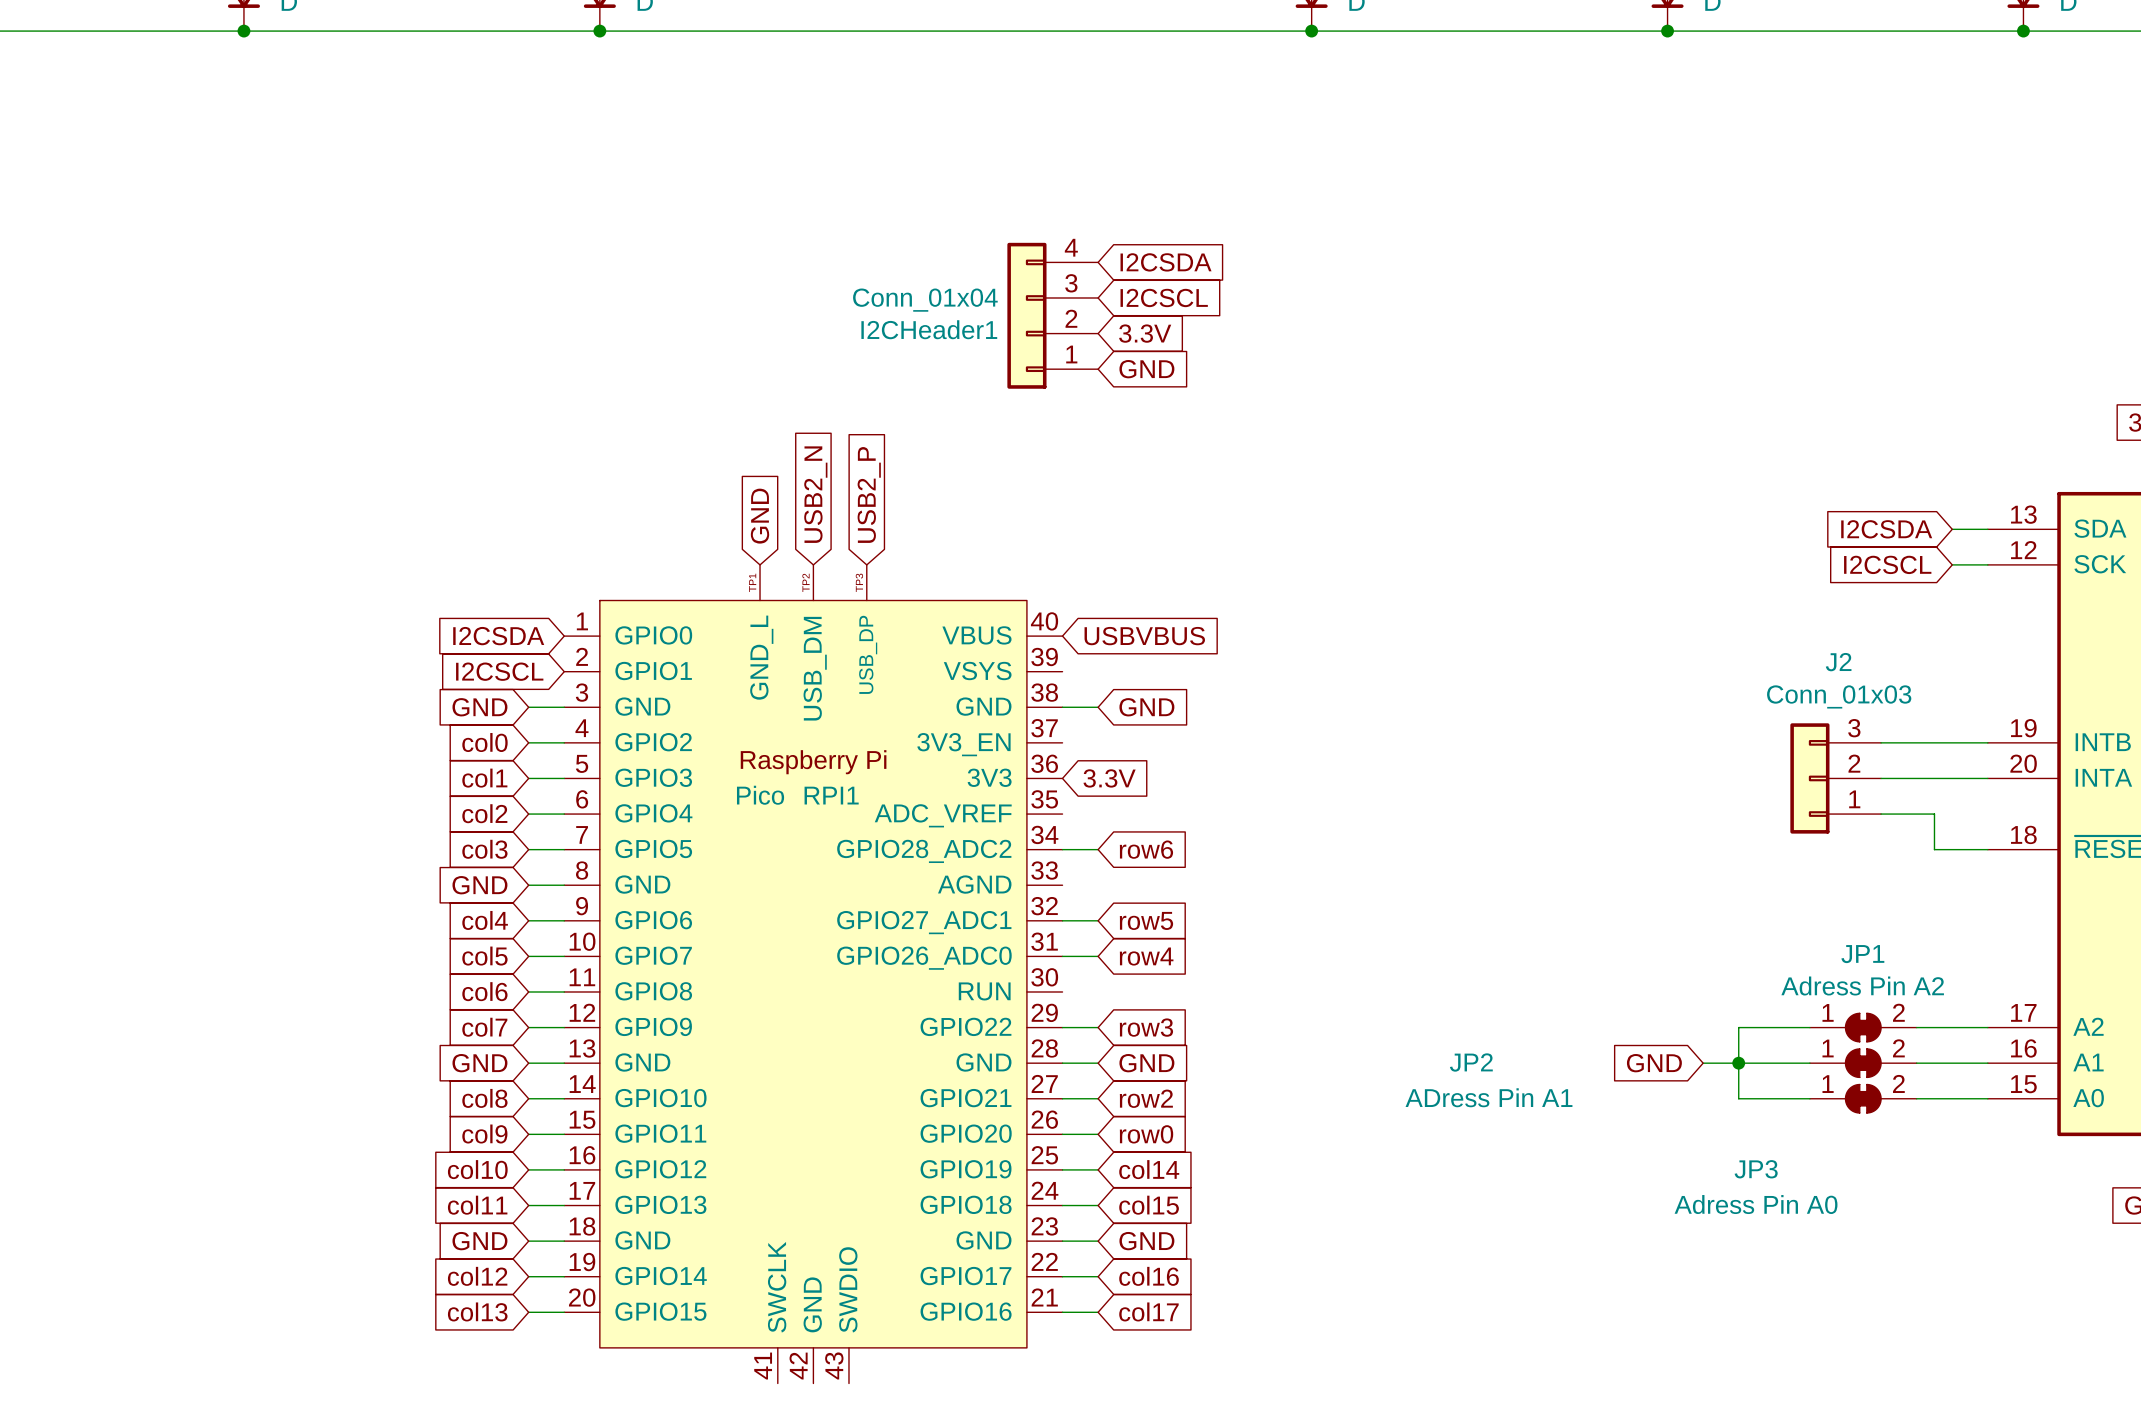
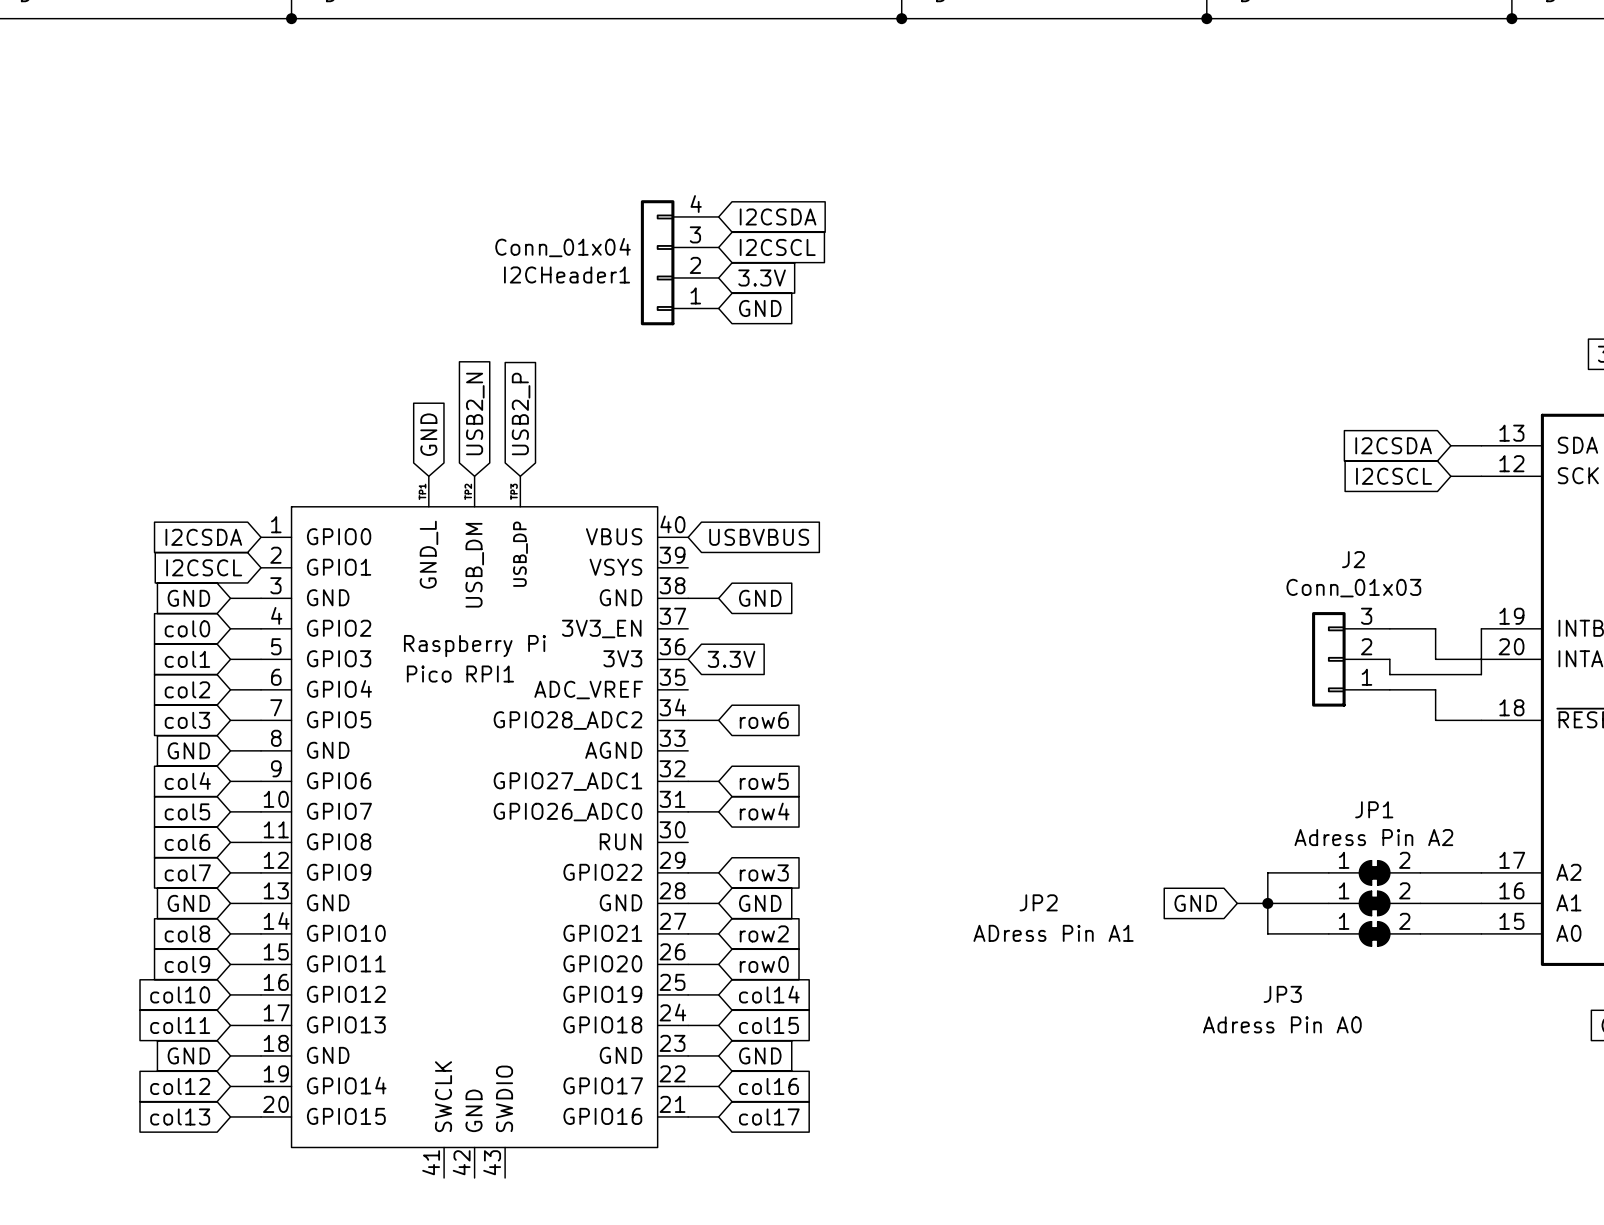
wire: (1934, 742) (1987, 742) -> (1435, 628) (1435, 659)
wire: (1881, 778) (1934, 778) -> (1389, 659) (1389, 674) (1481, 674) (1481, 628)

